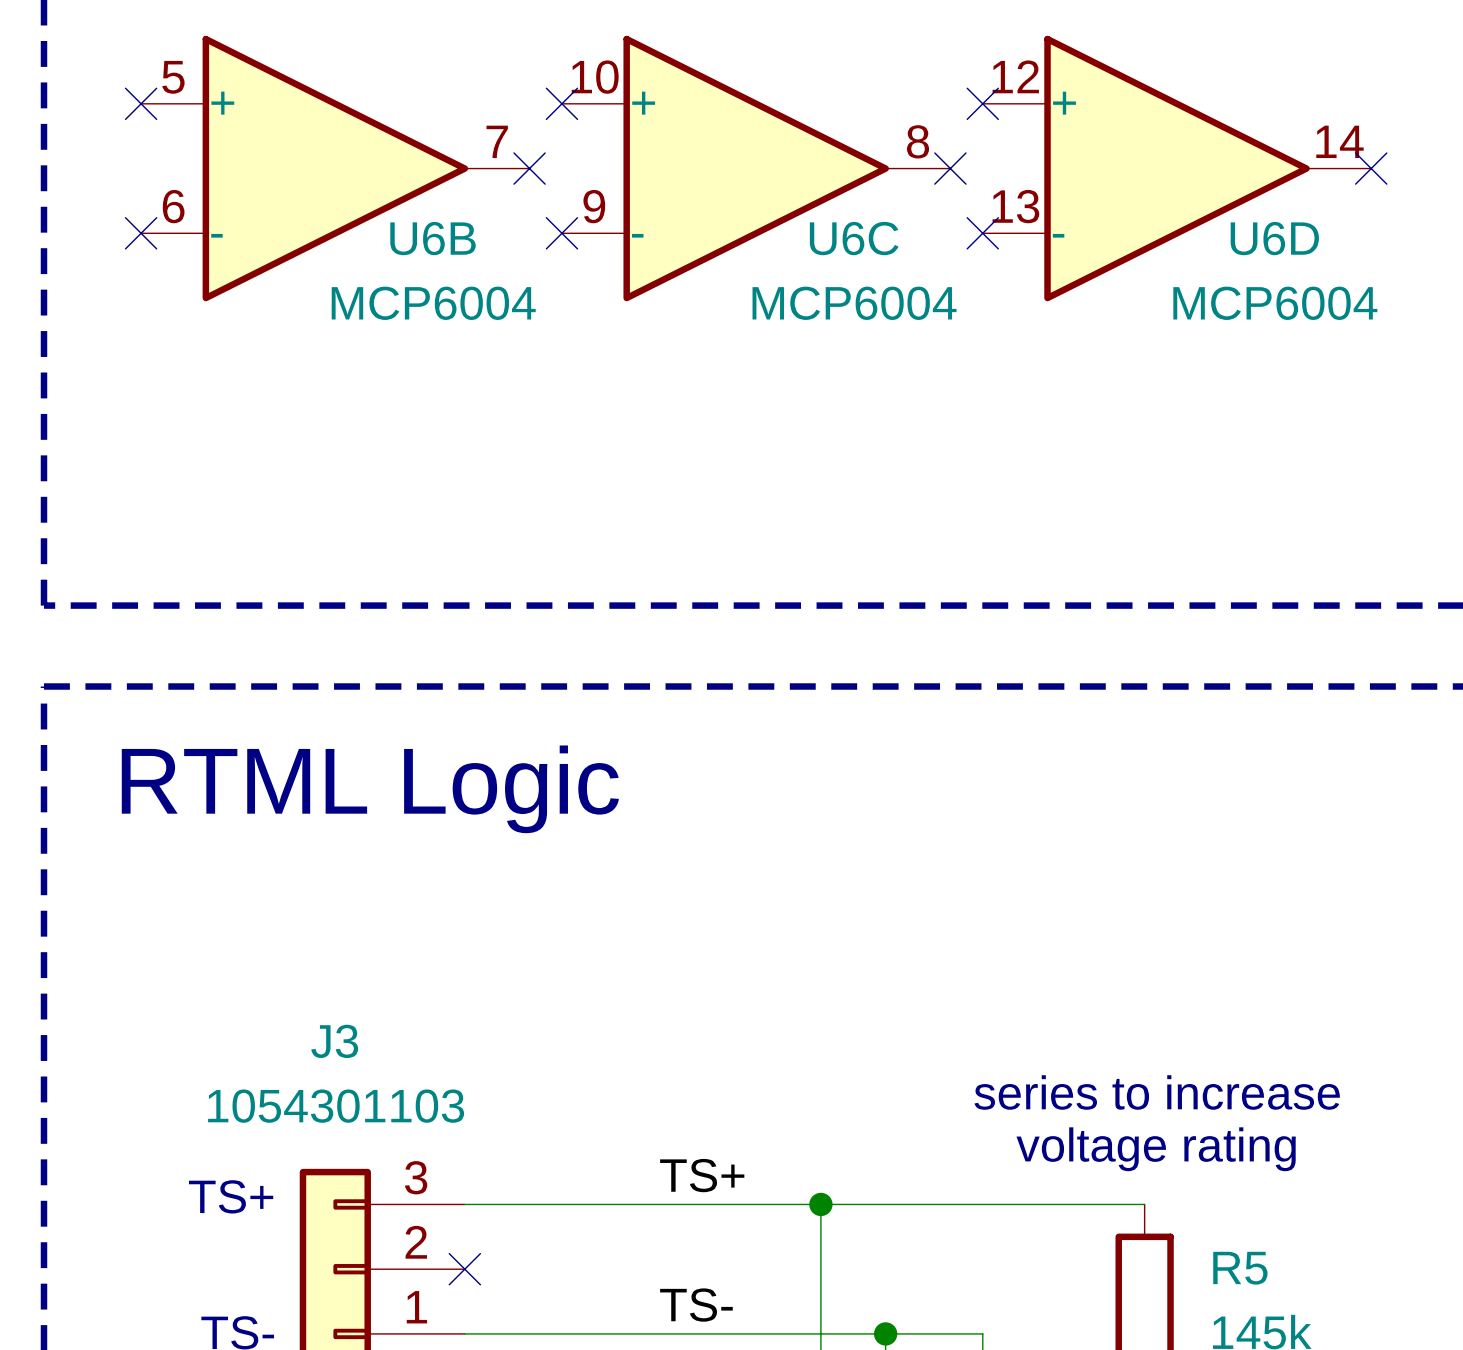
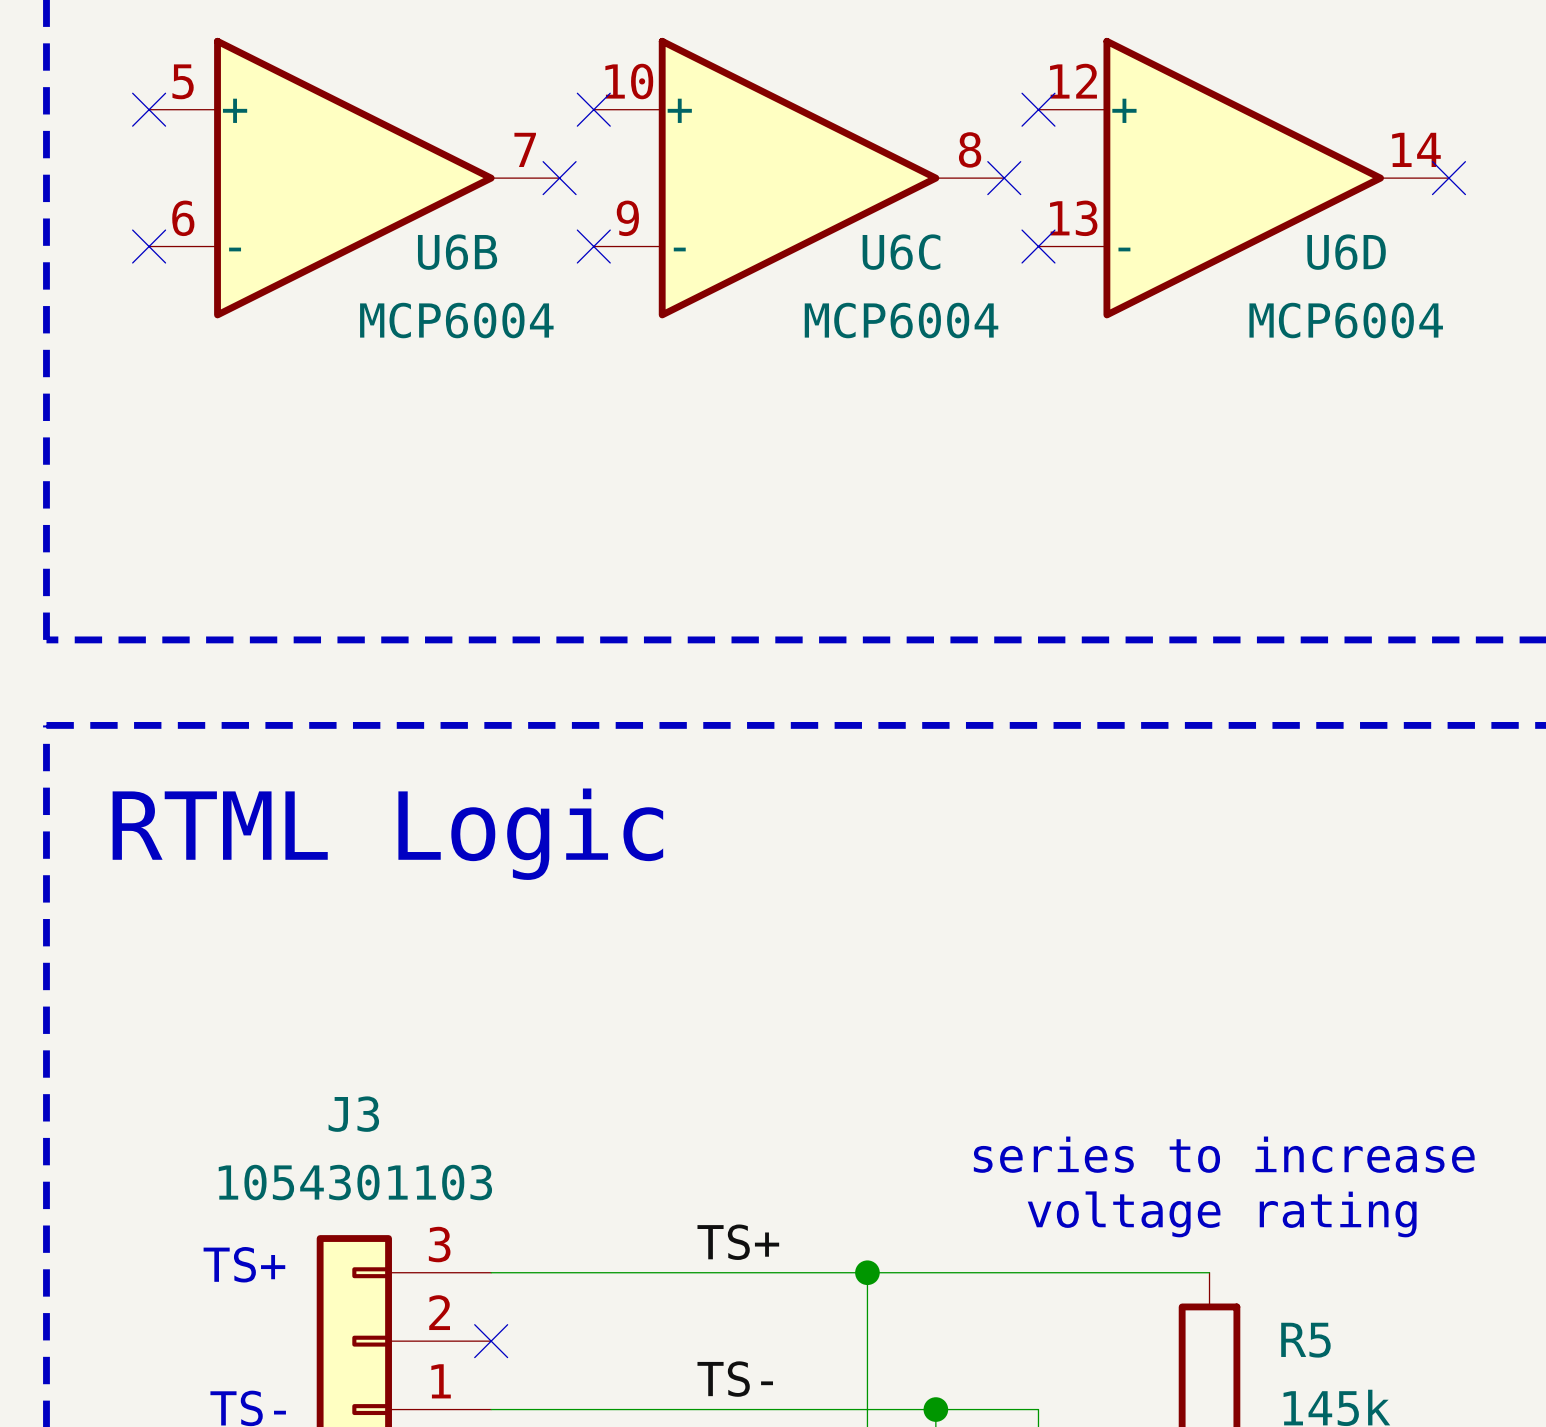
J3 name position: J3 (334, 1041) -> J3 (353, 1114)
J3 value position: 1054301103 (336, 1106) -> 1054301103 (355, 1182)

